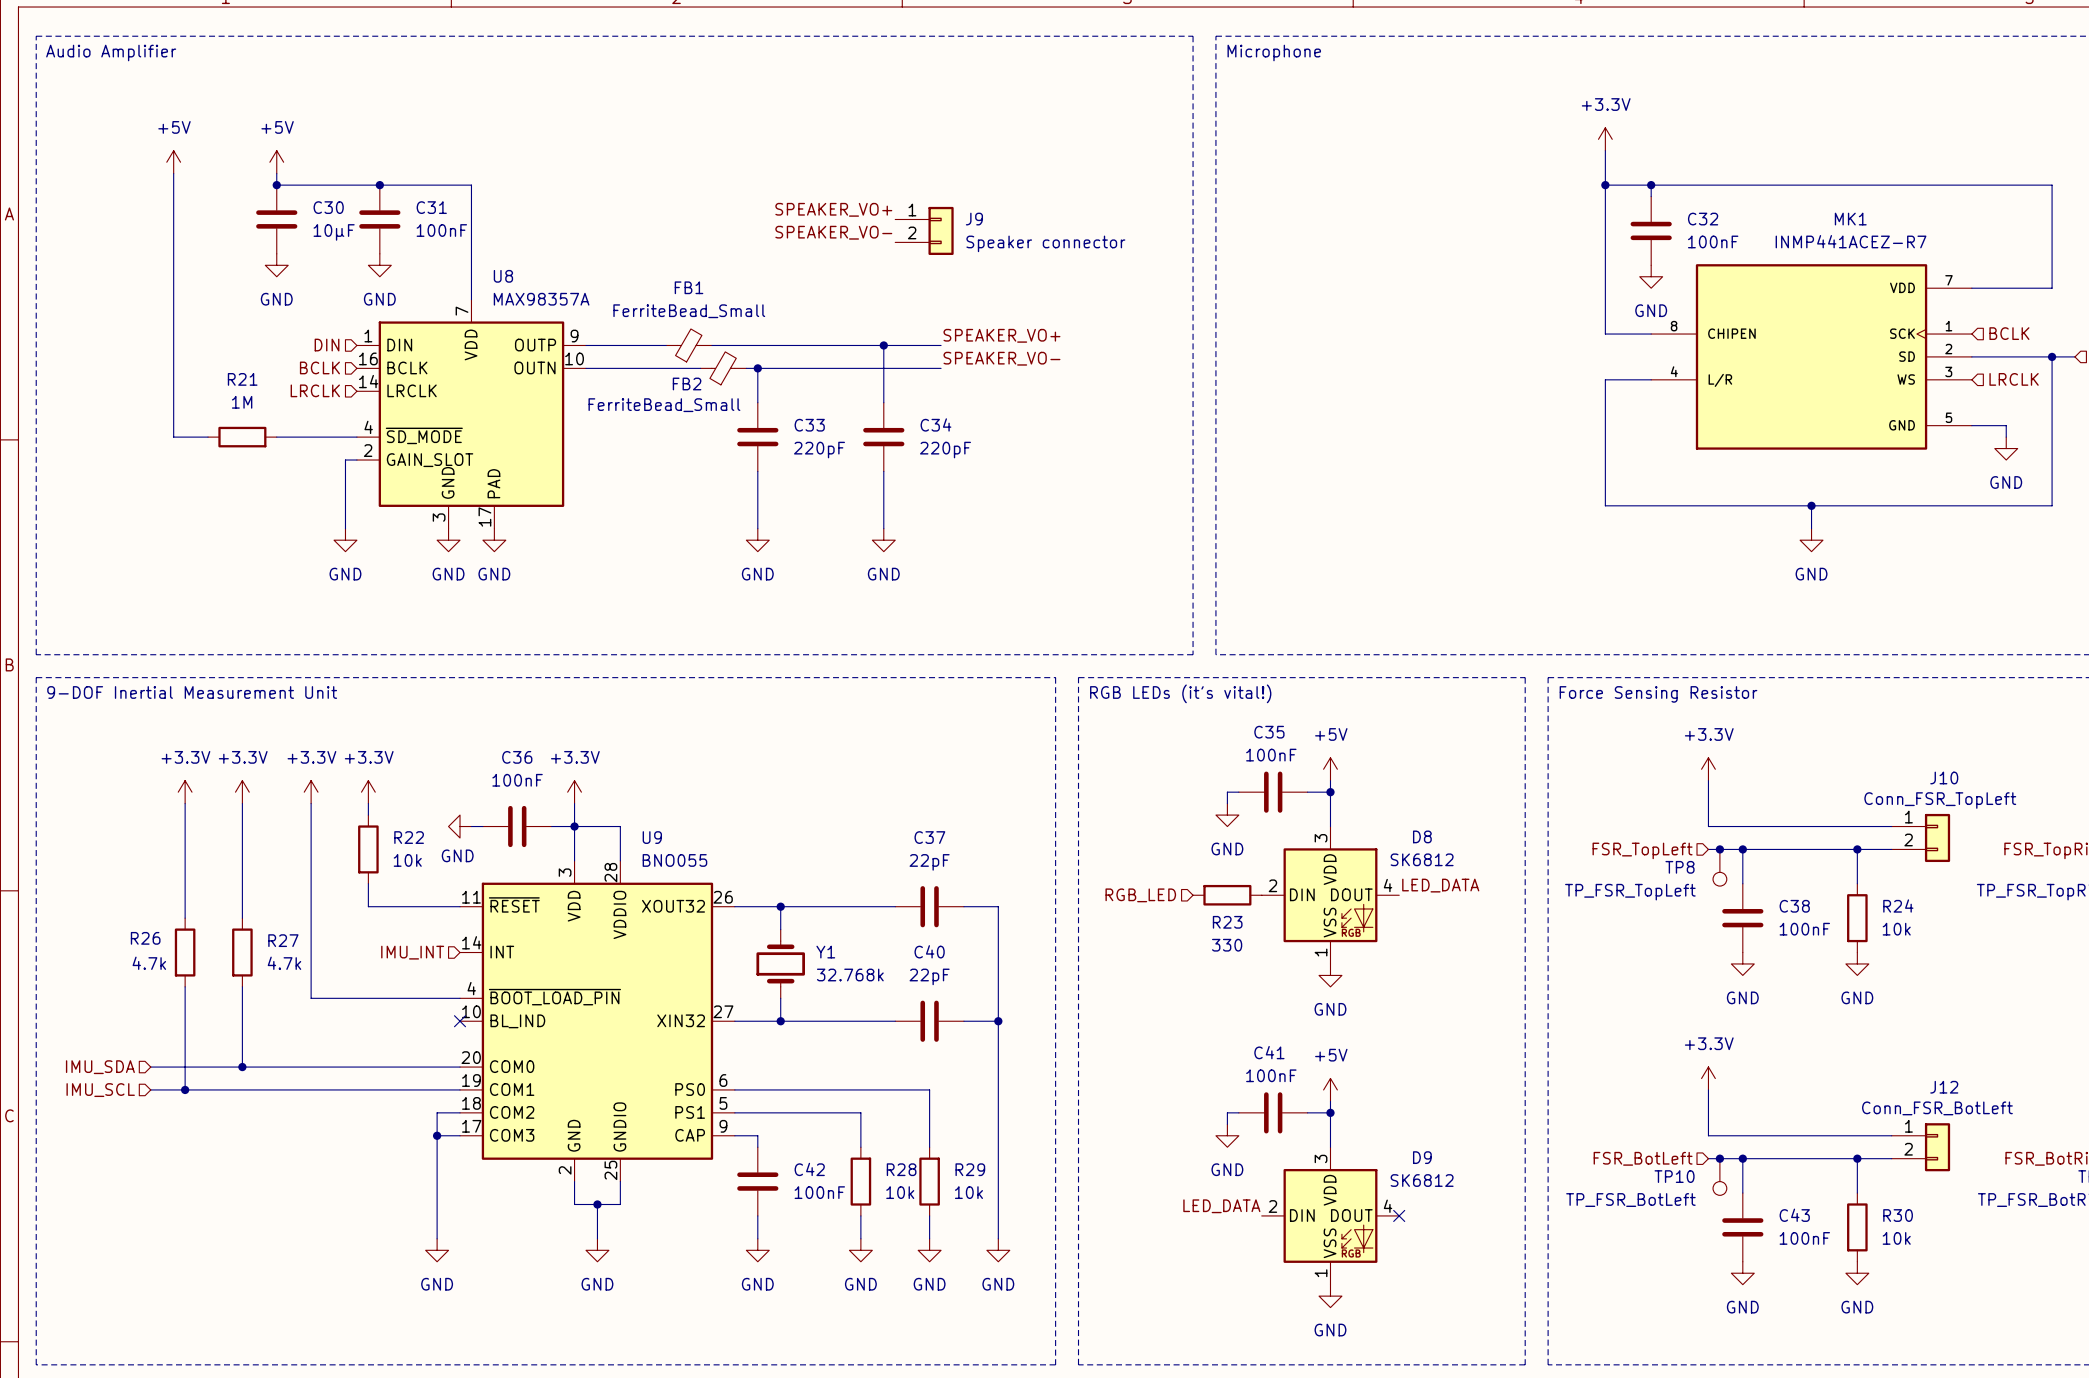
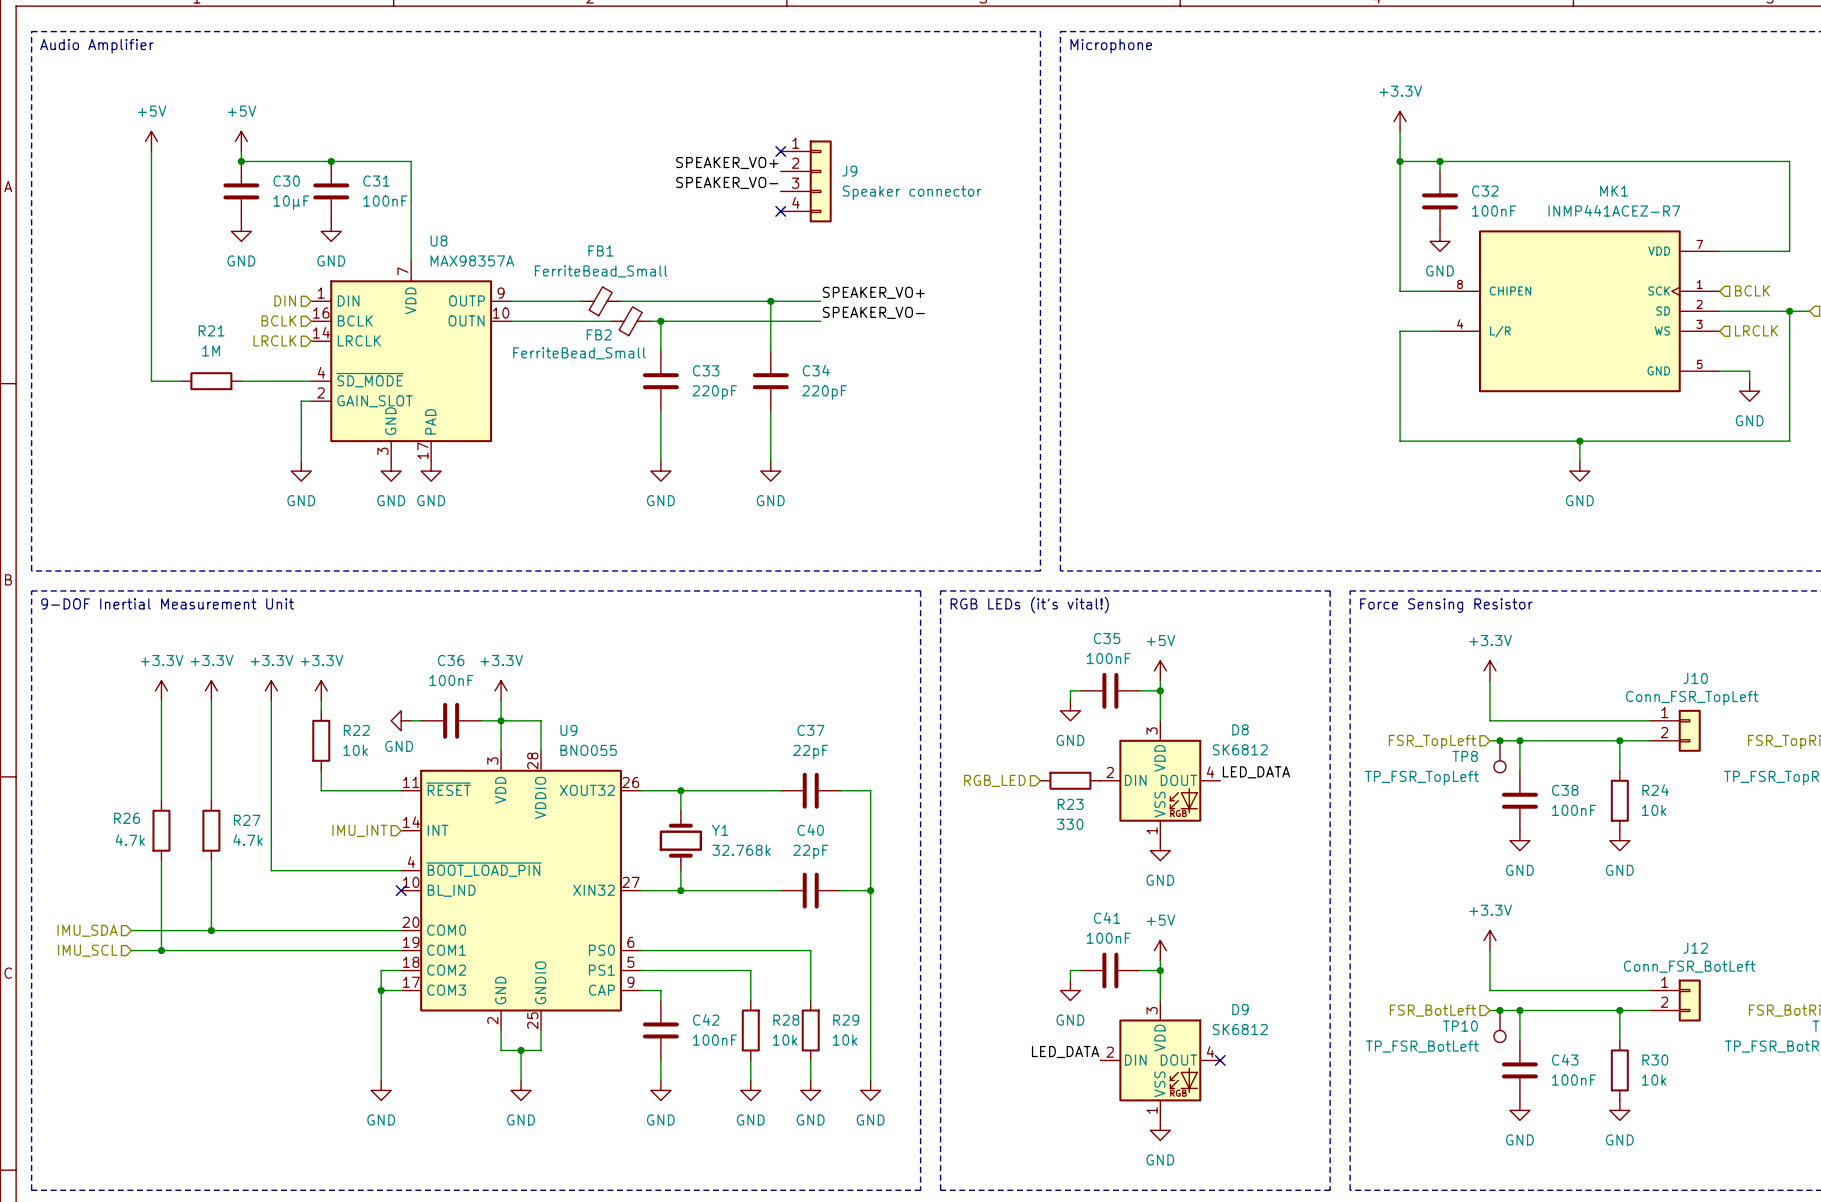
no-connect mark: none -> (780, 151)
label: none -> SPEAKER_VO+ (727, 163)
J9 symbol: [895, 206, 954, 255] -> [780, 140, 832, 223]
label: SPEAKER_VO+ (833, 209) -> SPEAKER_VO- (727, 182)
label: SPEAKER_VO- (833, 232) -> none
no-connect mark: none -> (780, 211)

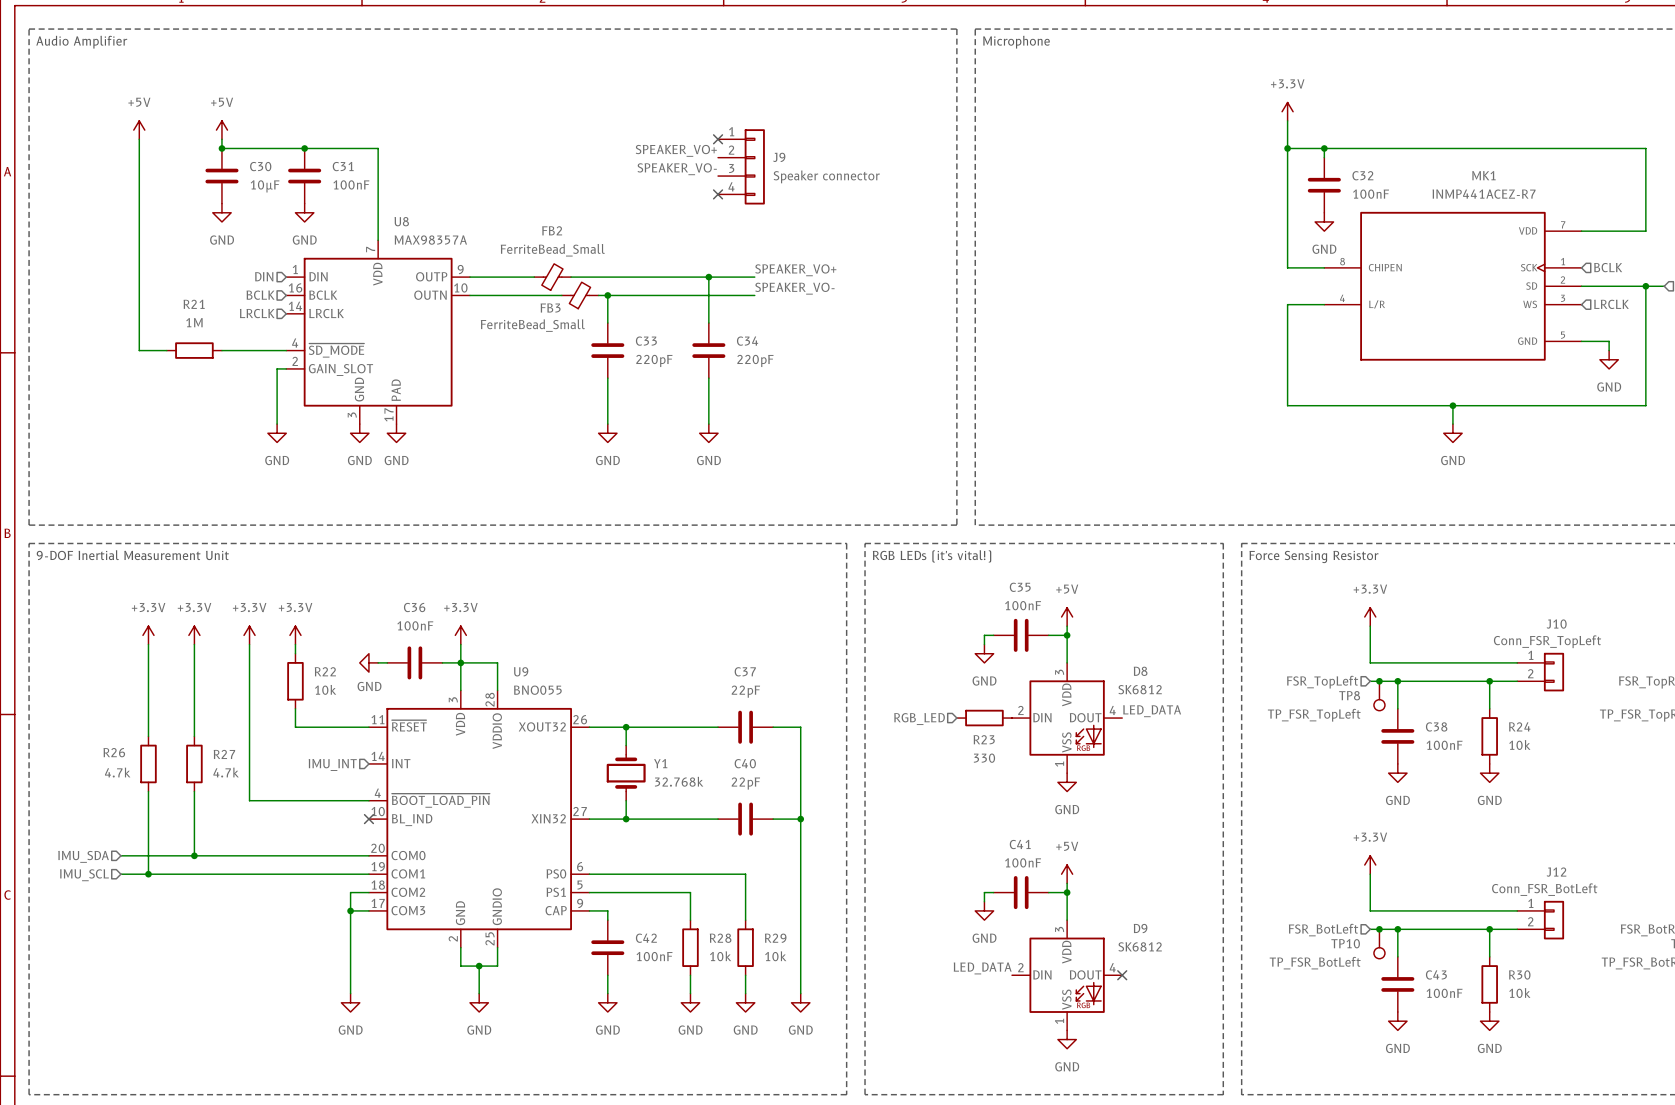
FB1 name: FB1 (600, 250) -> FB2 (552, 230)
FB2 name: FB2 (599, 334) -> FB3 (550, 308)

